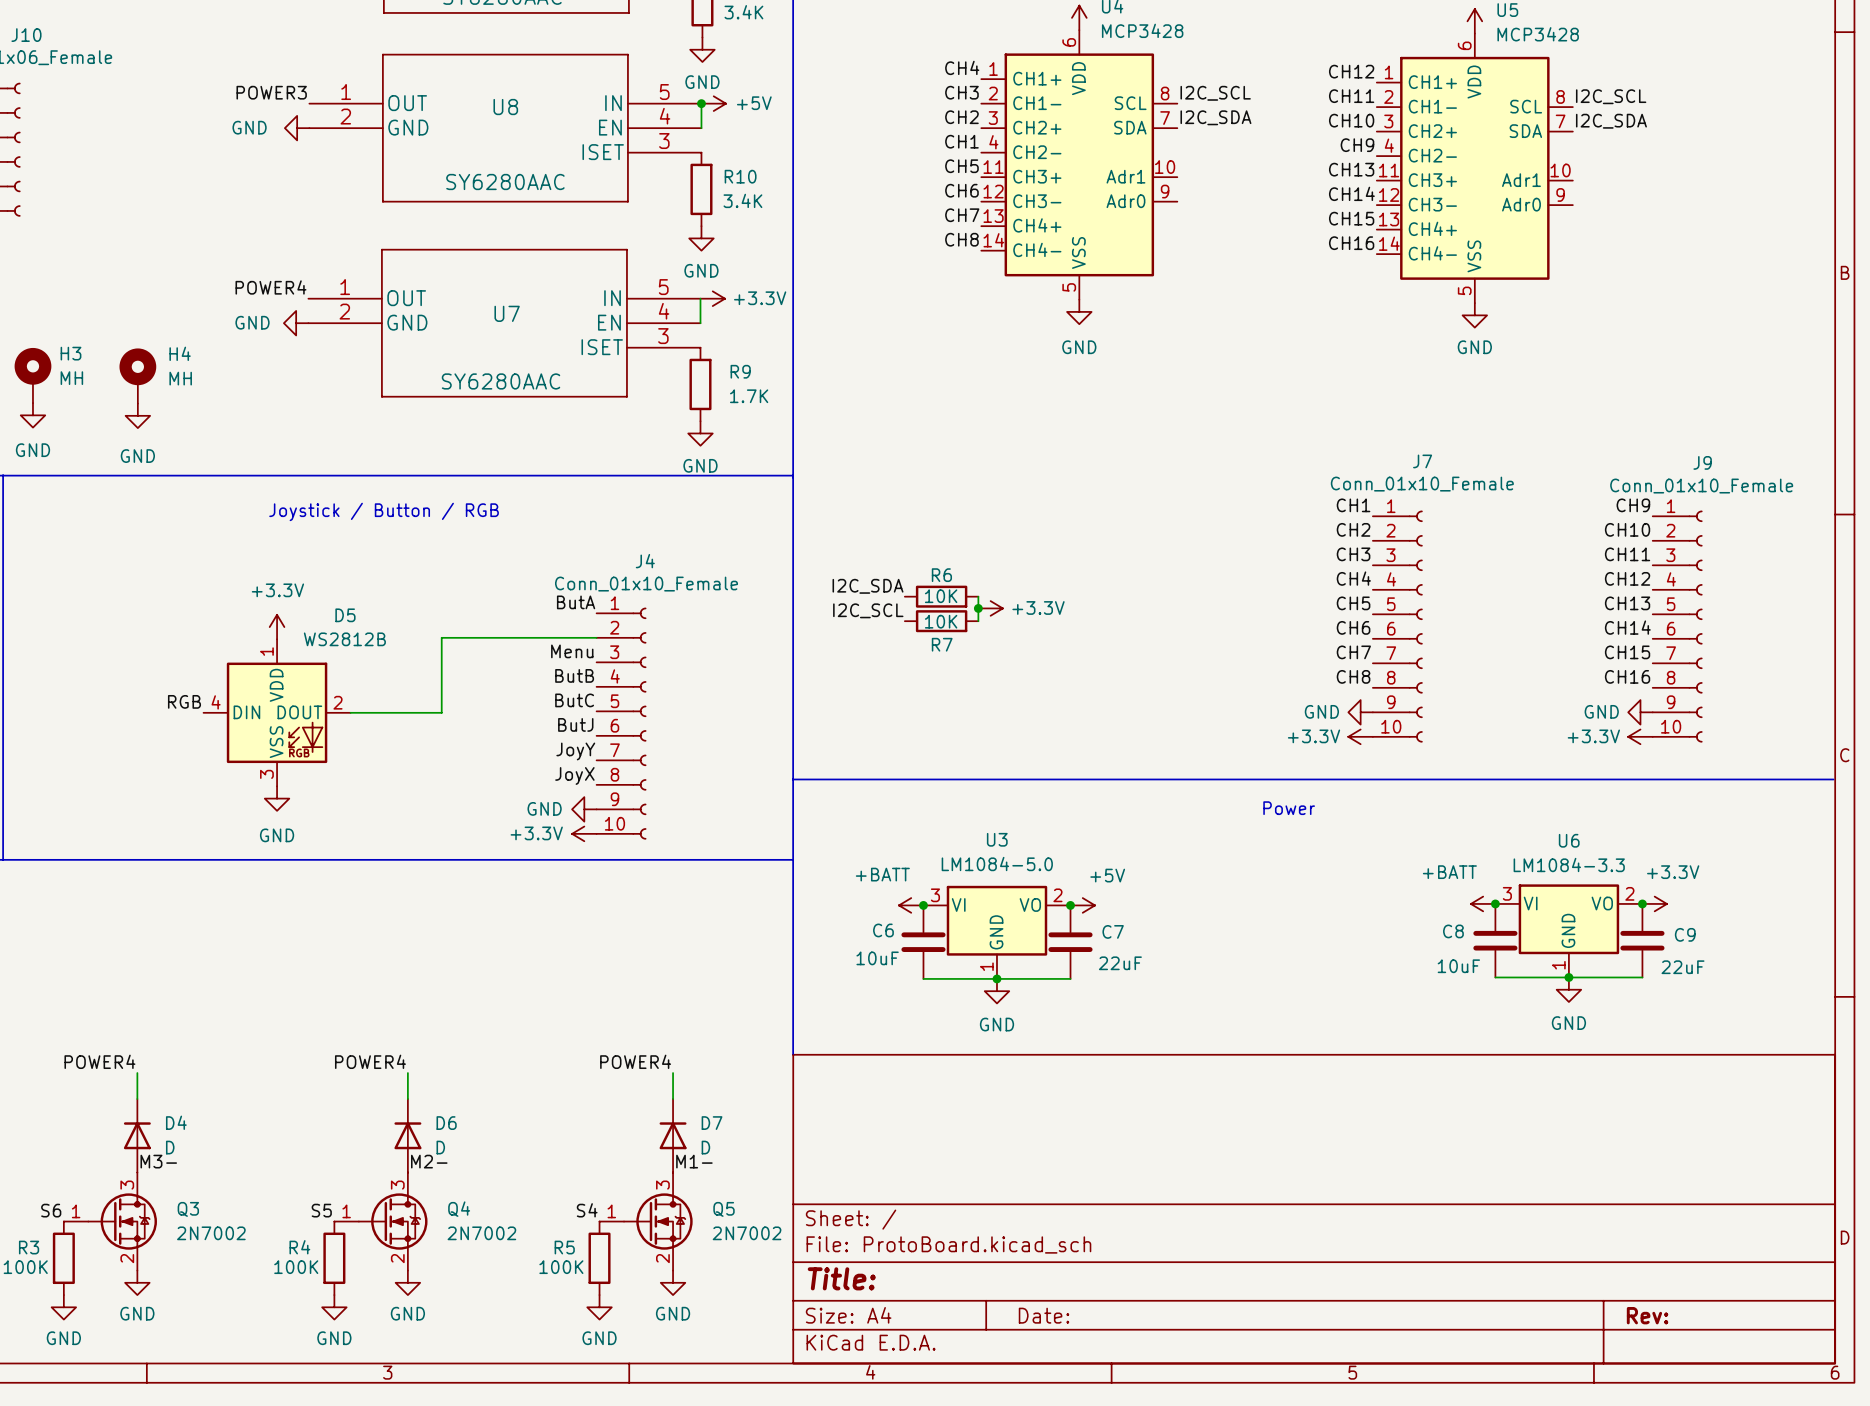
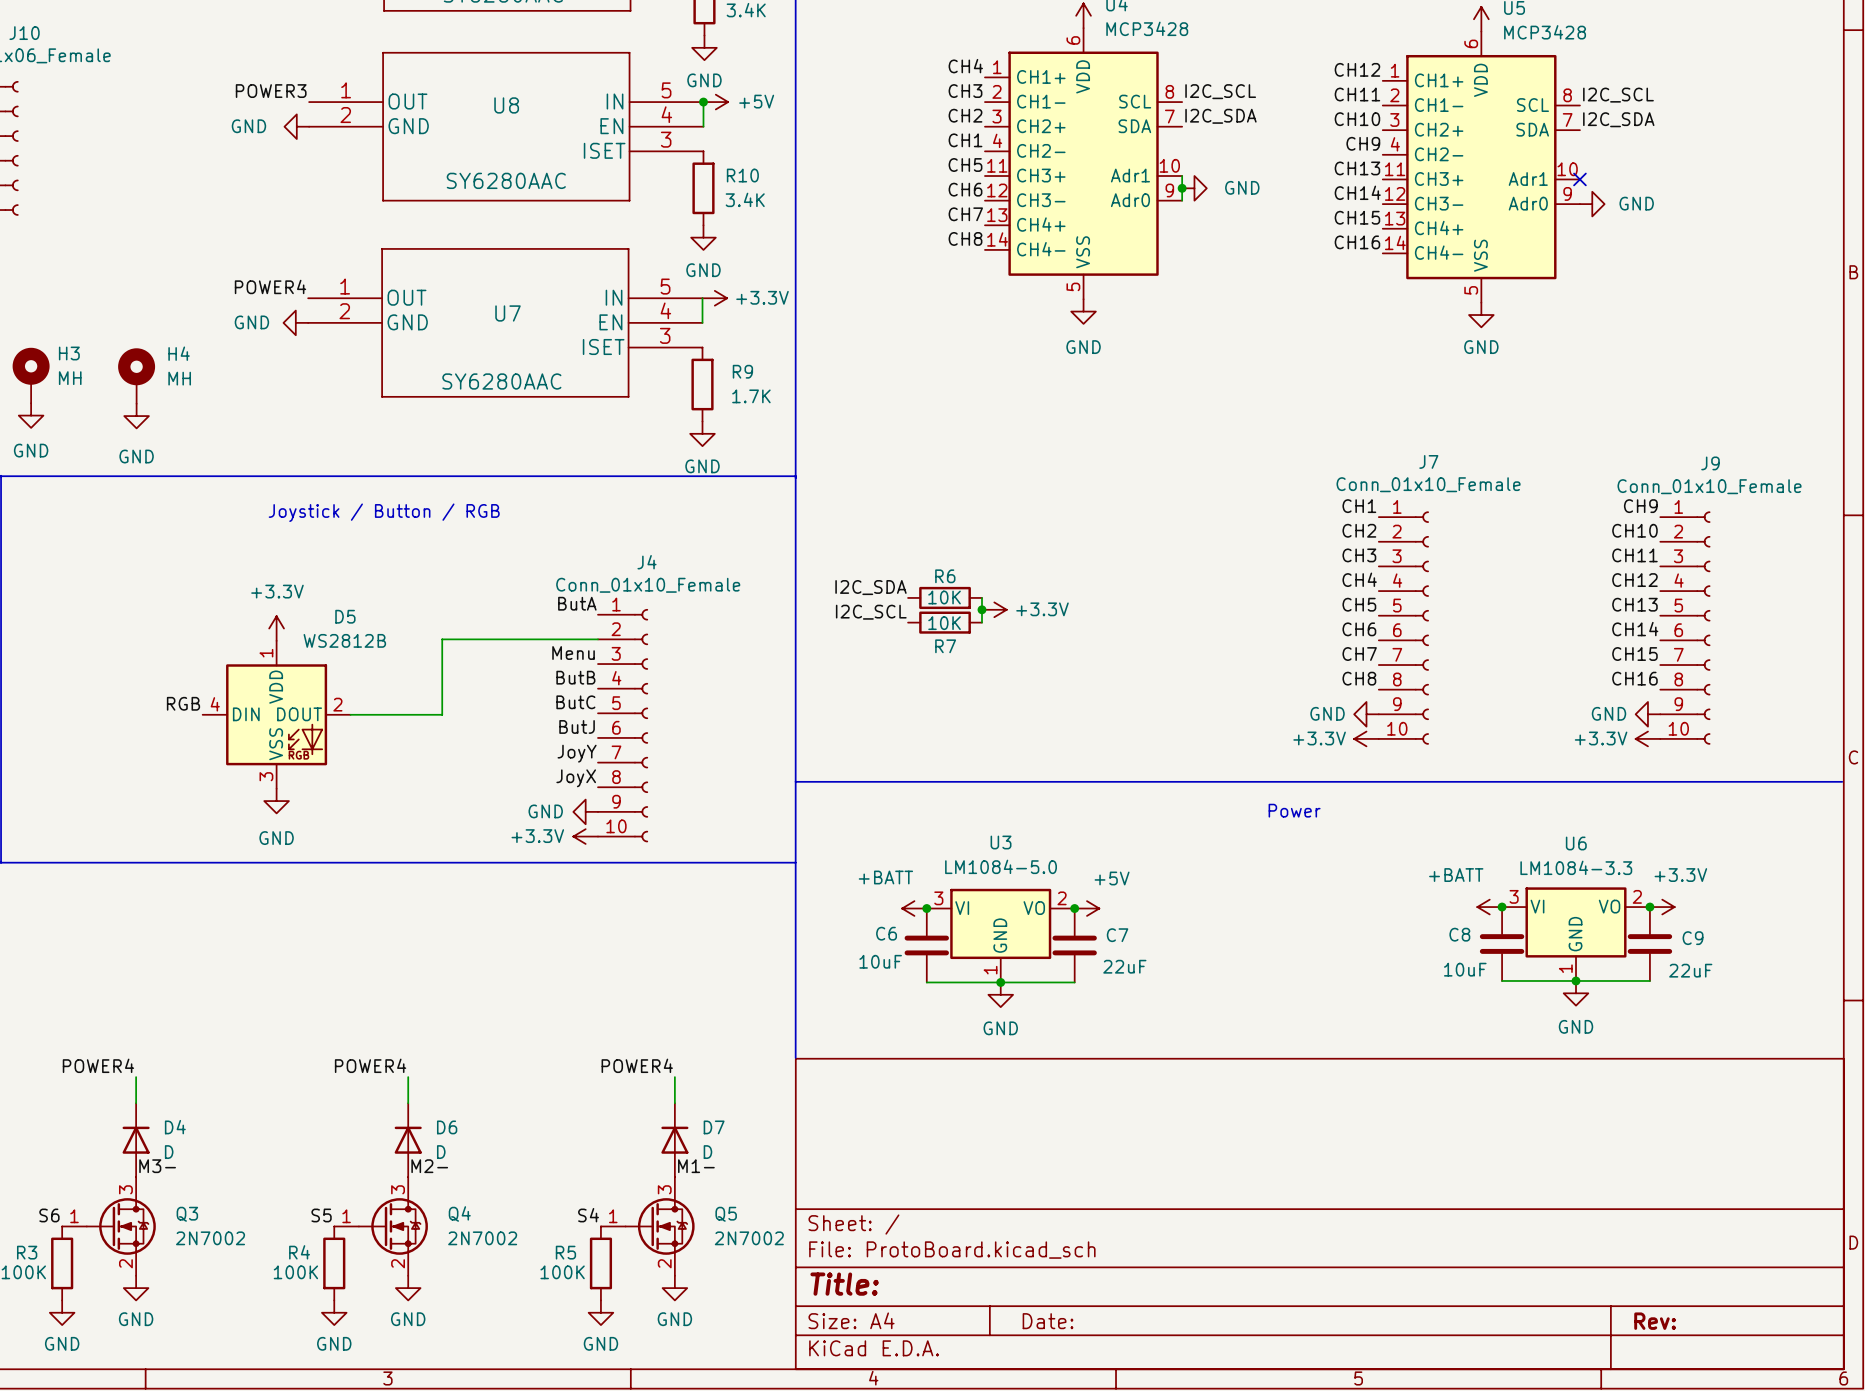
wire: none -> (1182, 176) (1182, 200)
no-connect mark: none -> (1579, 179)
junction: none -> (1182, 188)
power symbol: none -> GND (1194, 188)
power symbol: none -> GND (1592, 204)

